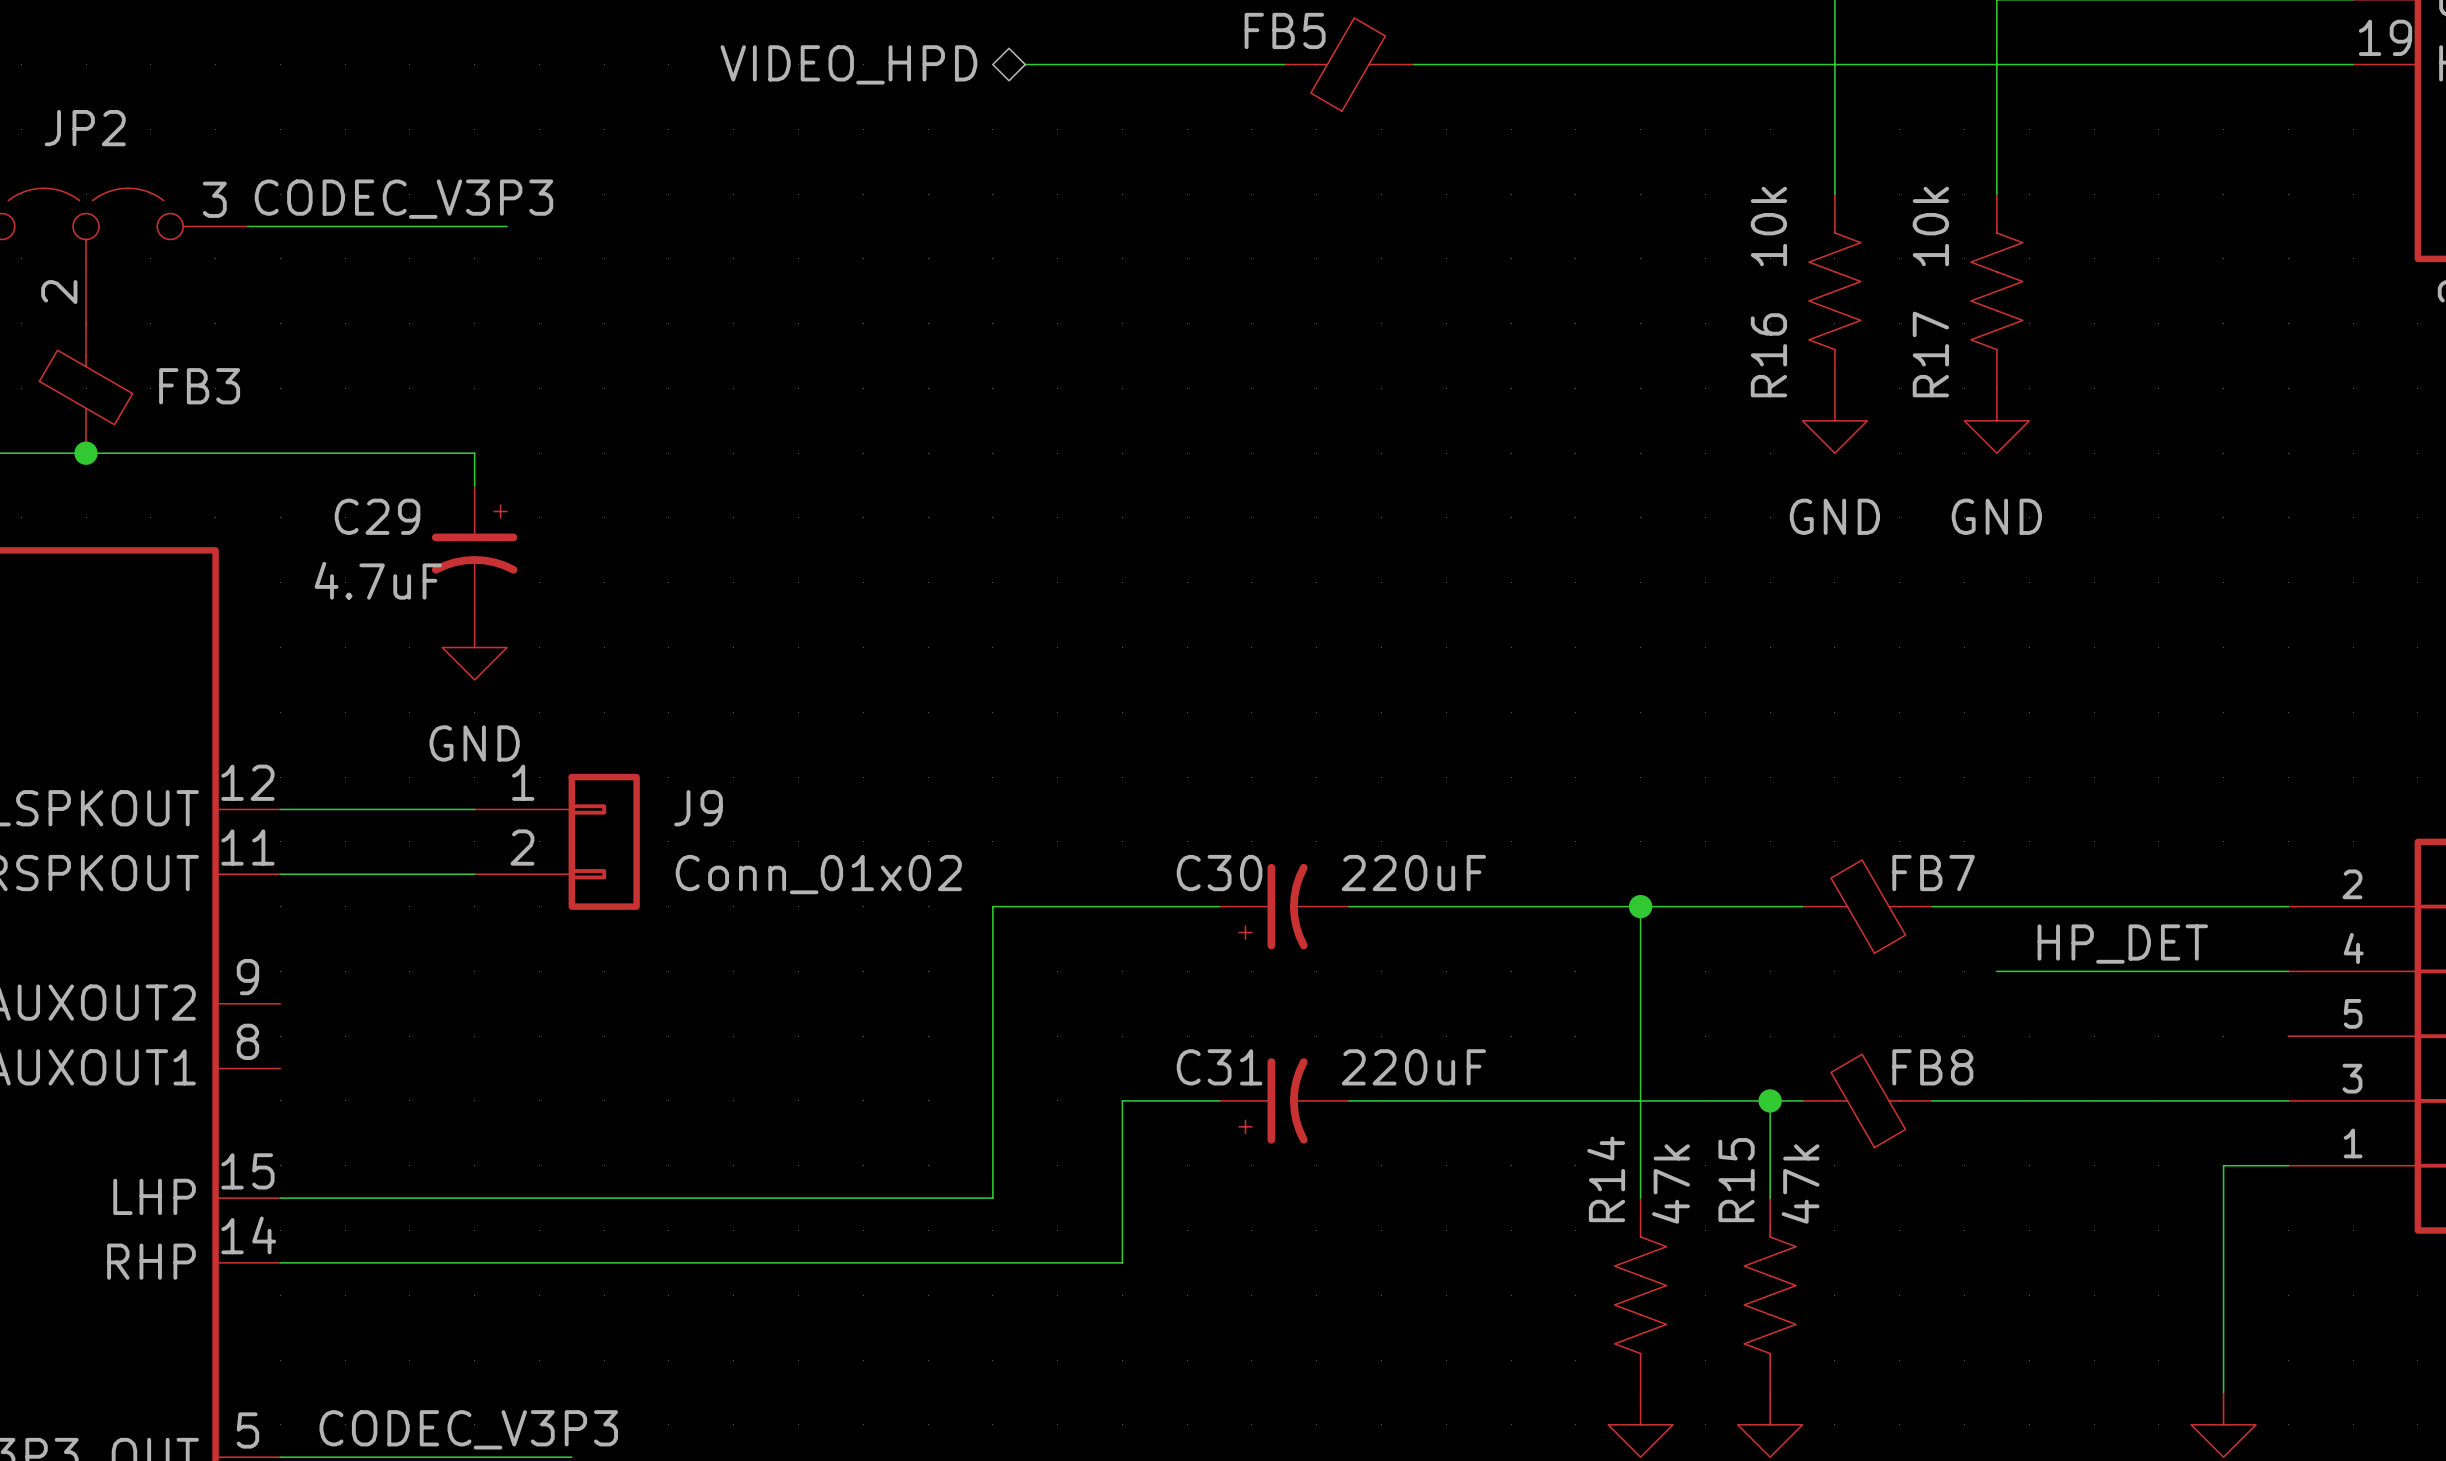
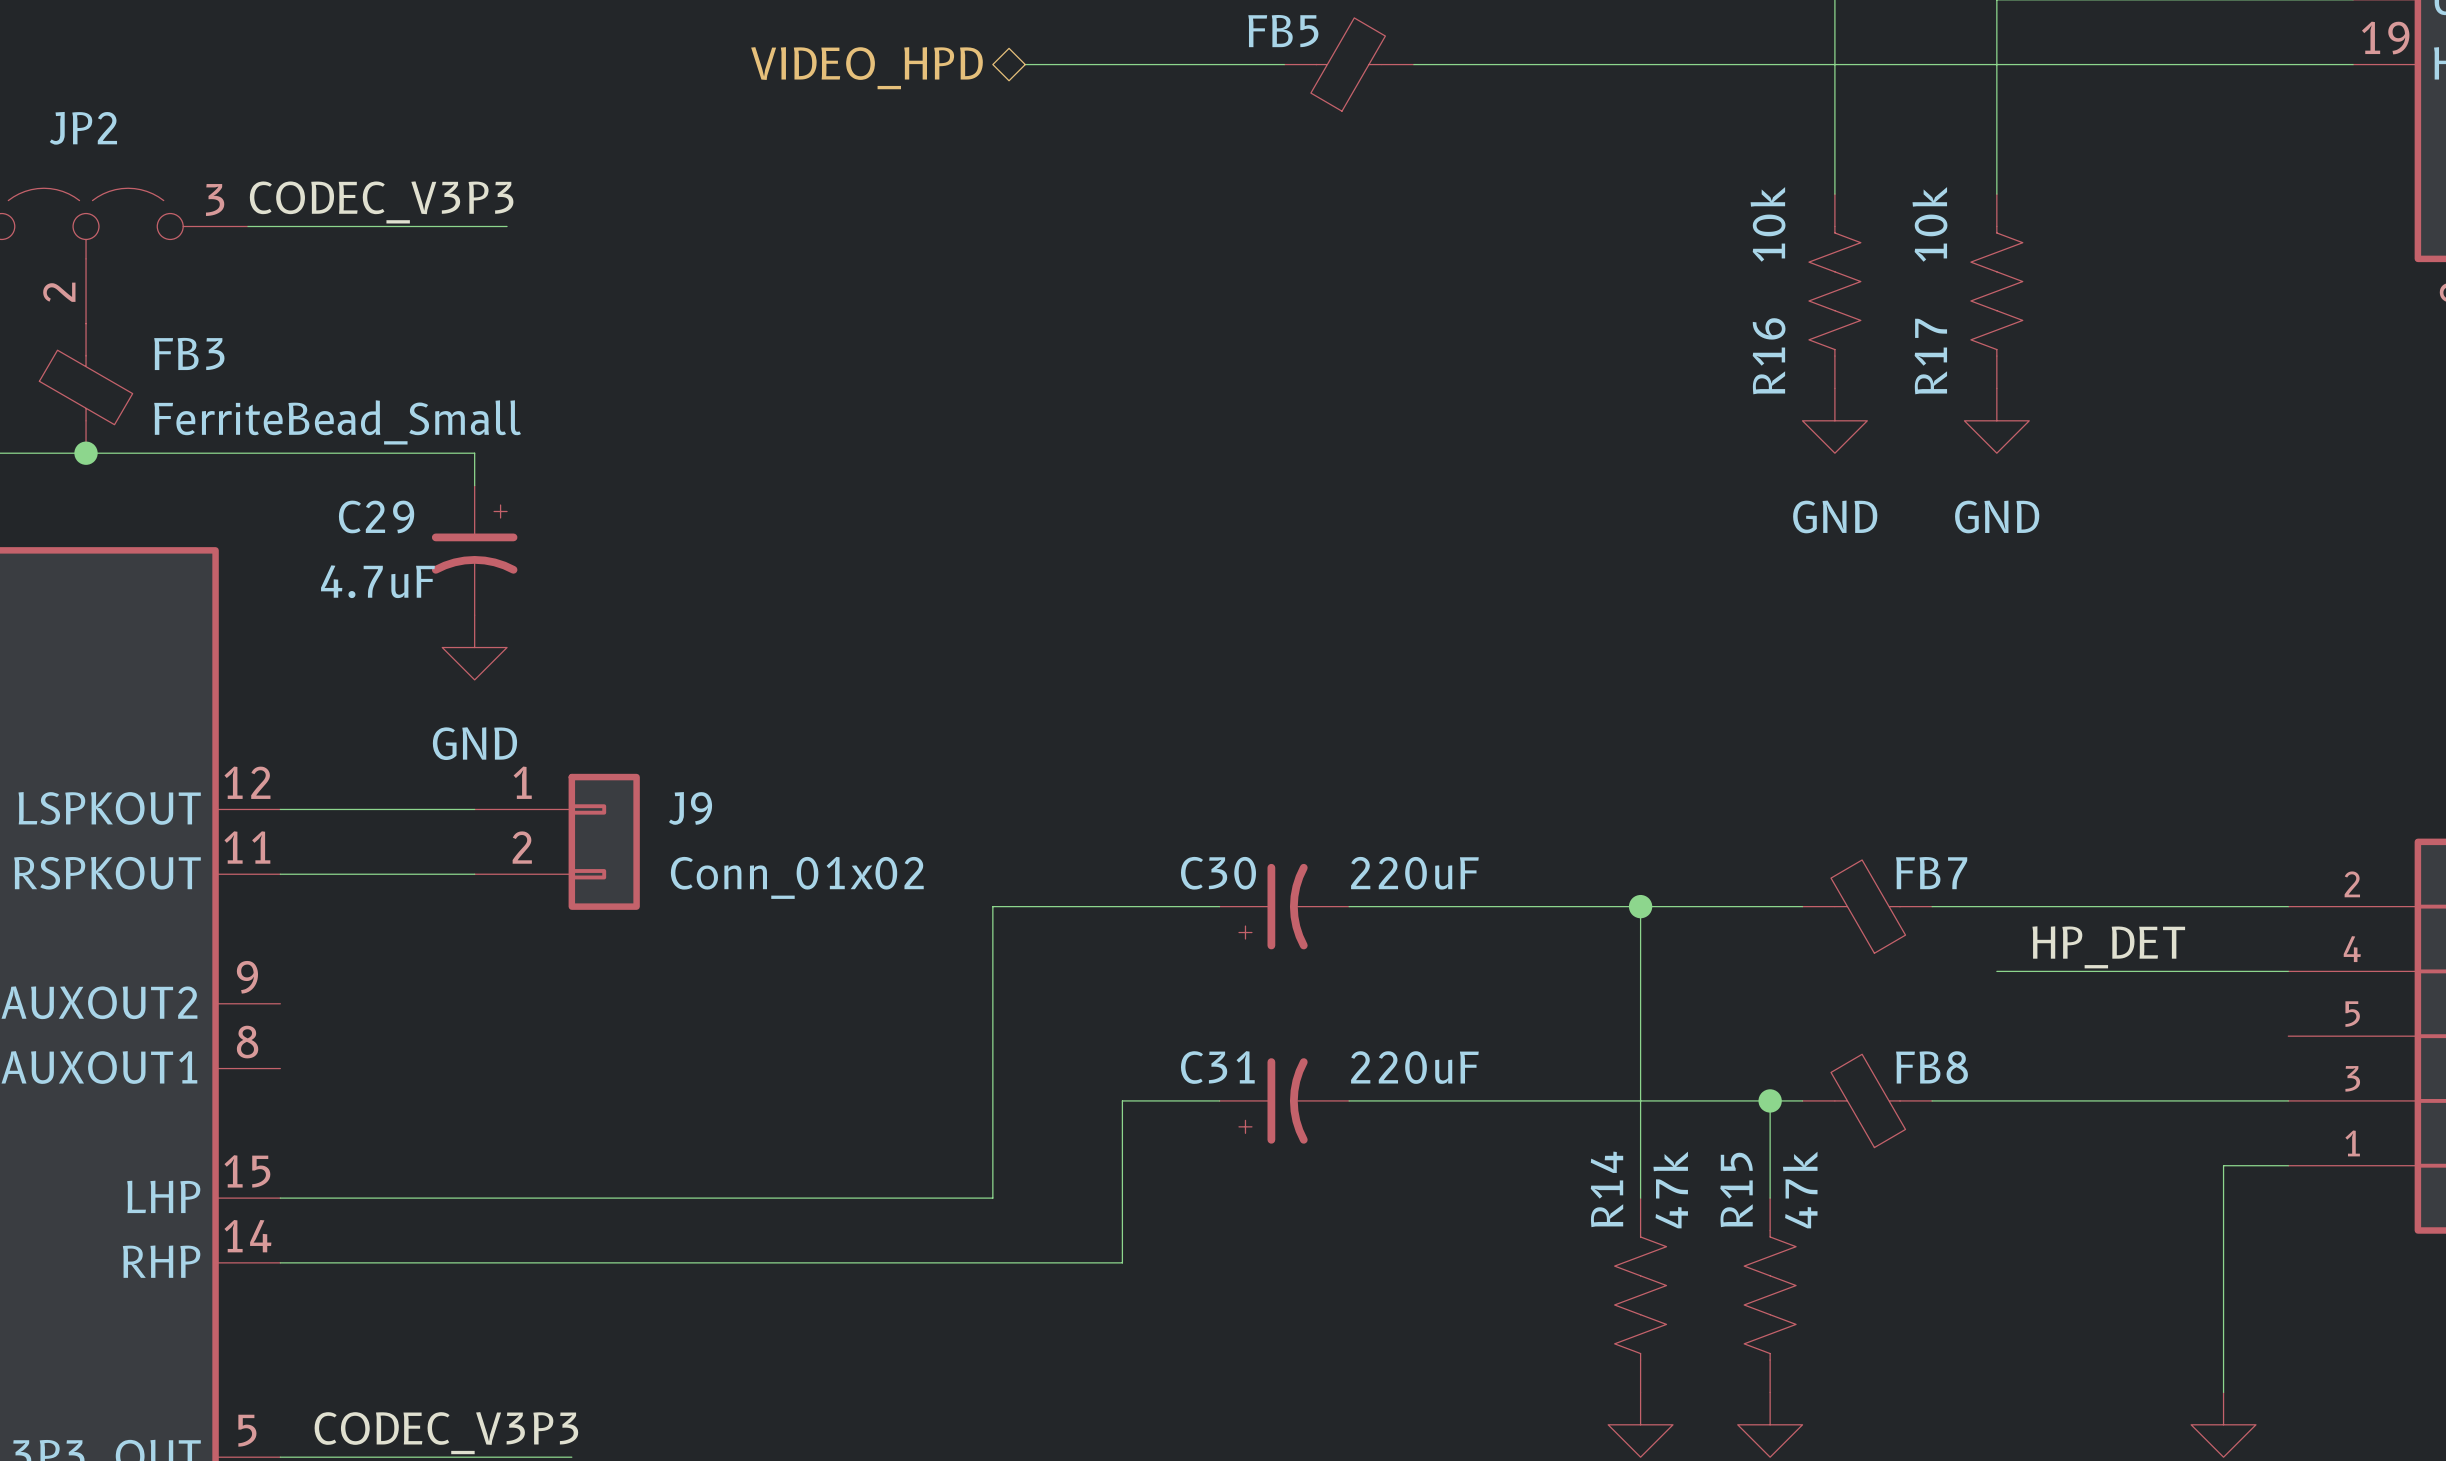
FB3 name position: FB3 (199, 386) -> FB3 (189, 353)
FB3 value: none -> FerriteBead_Small (337, 422)

